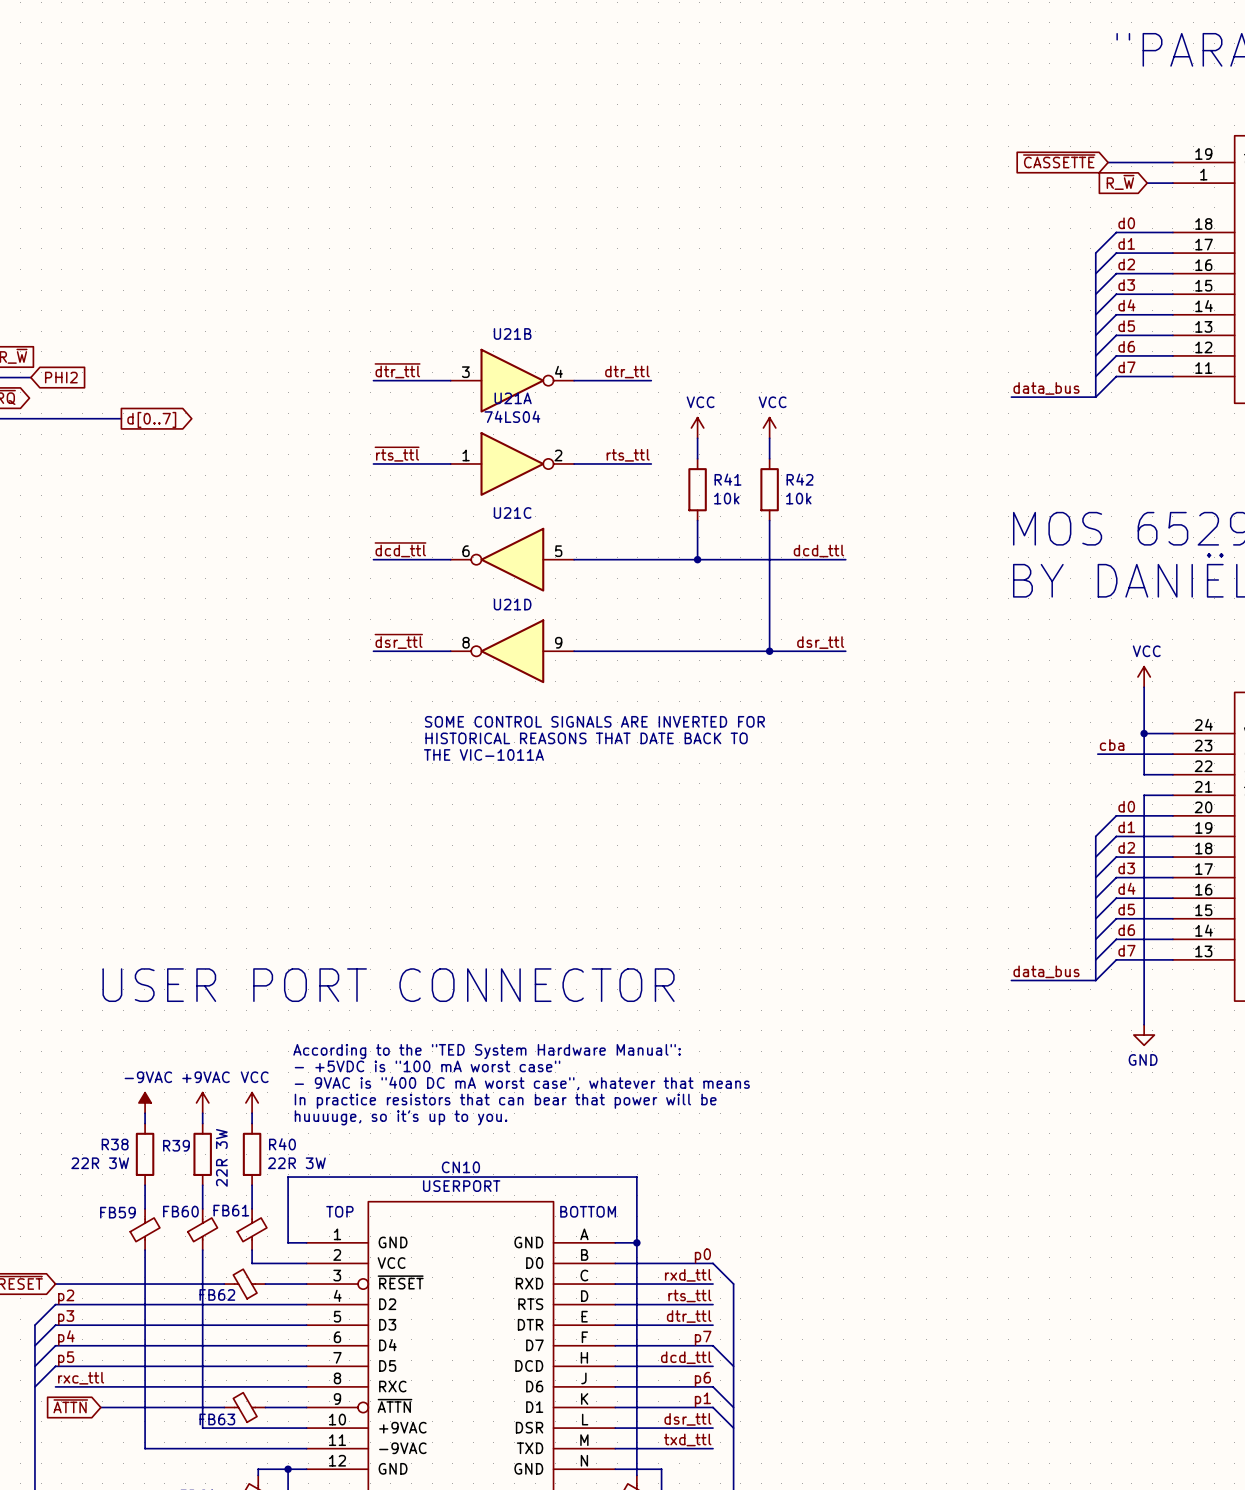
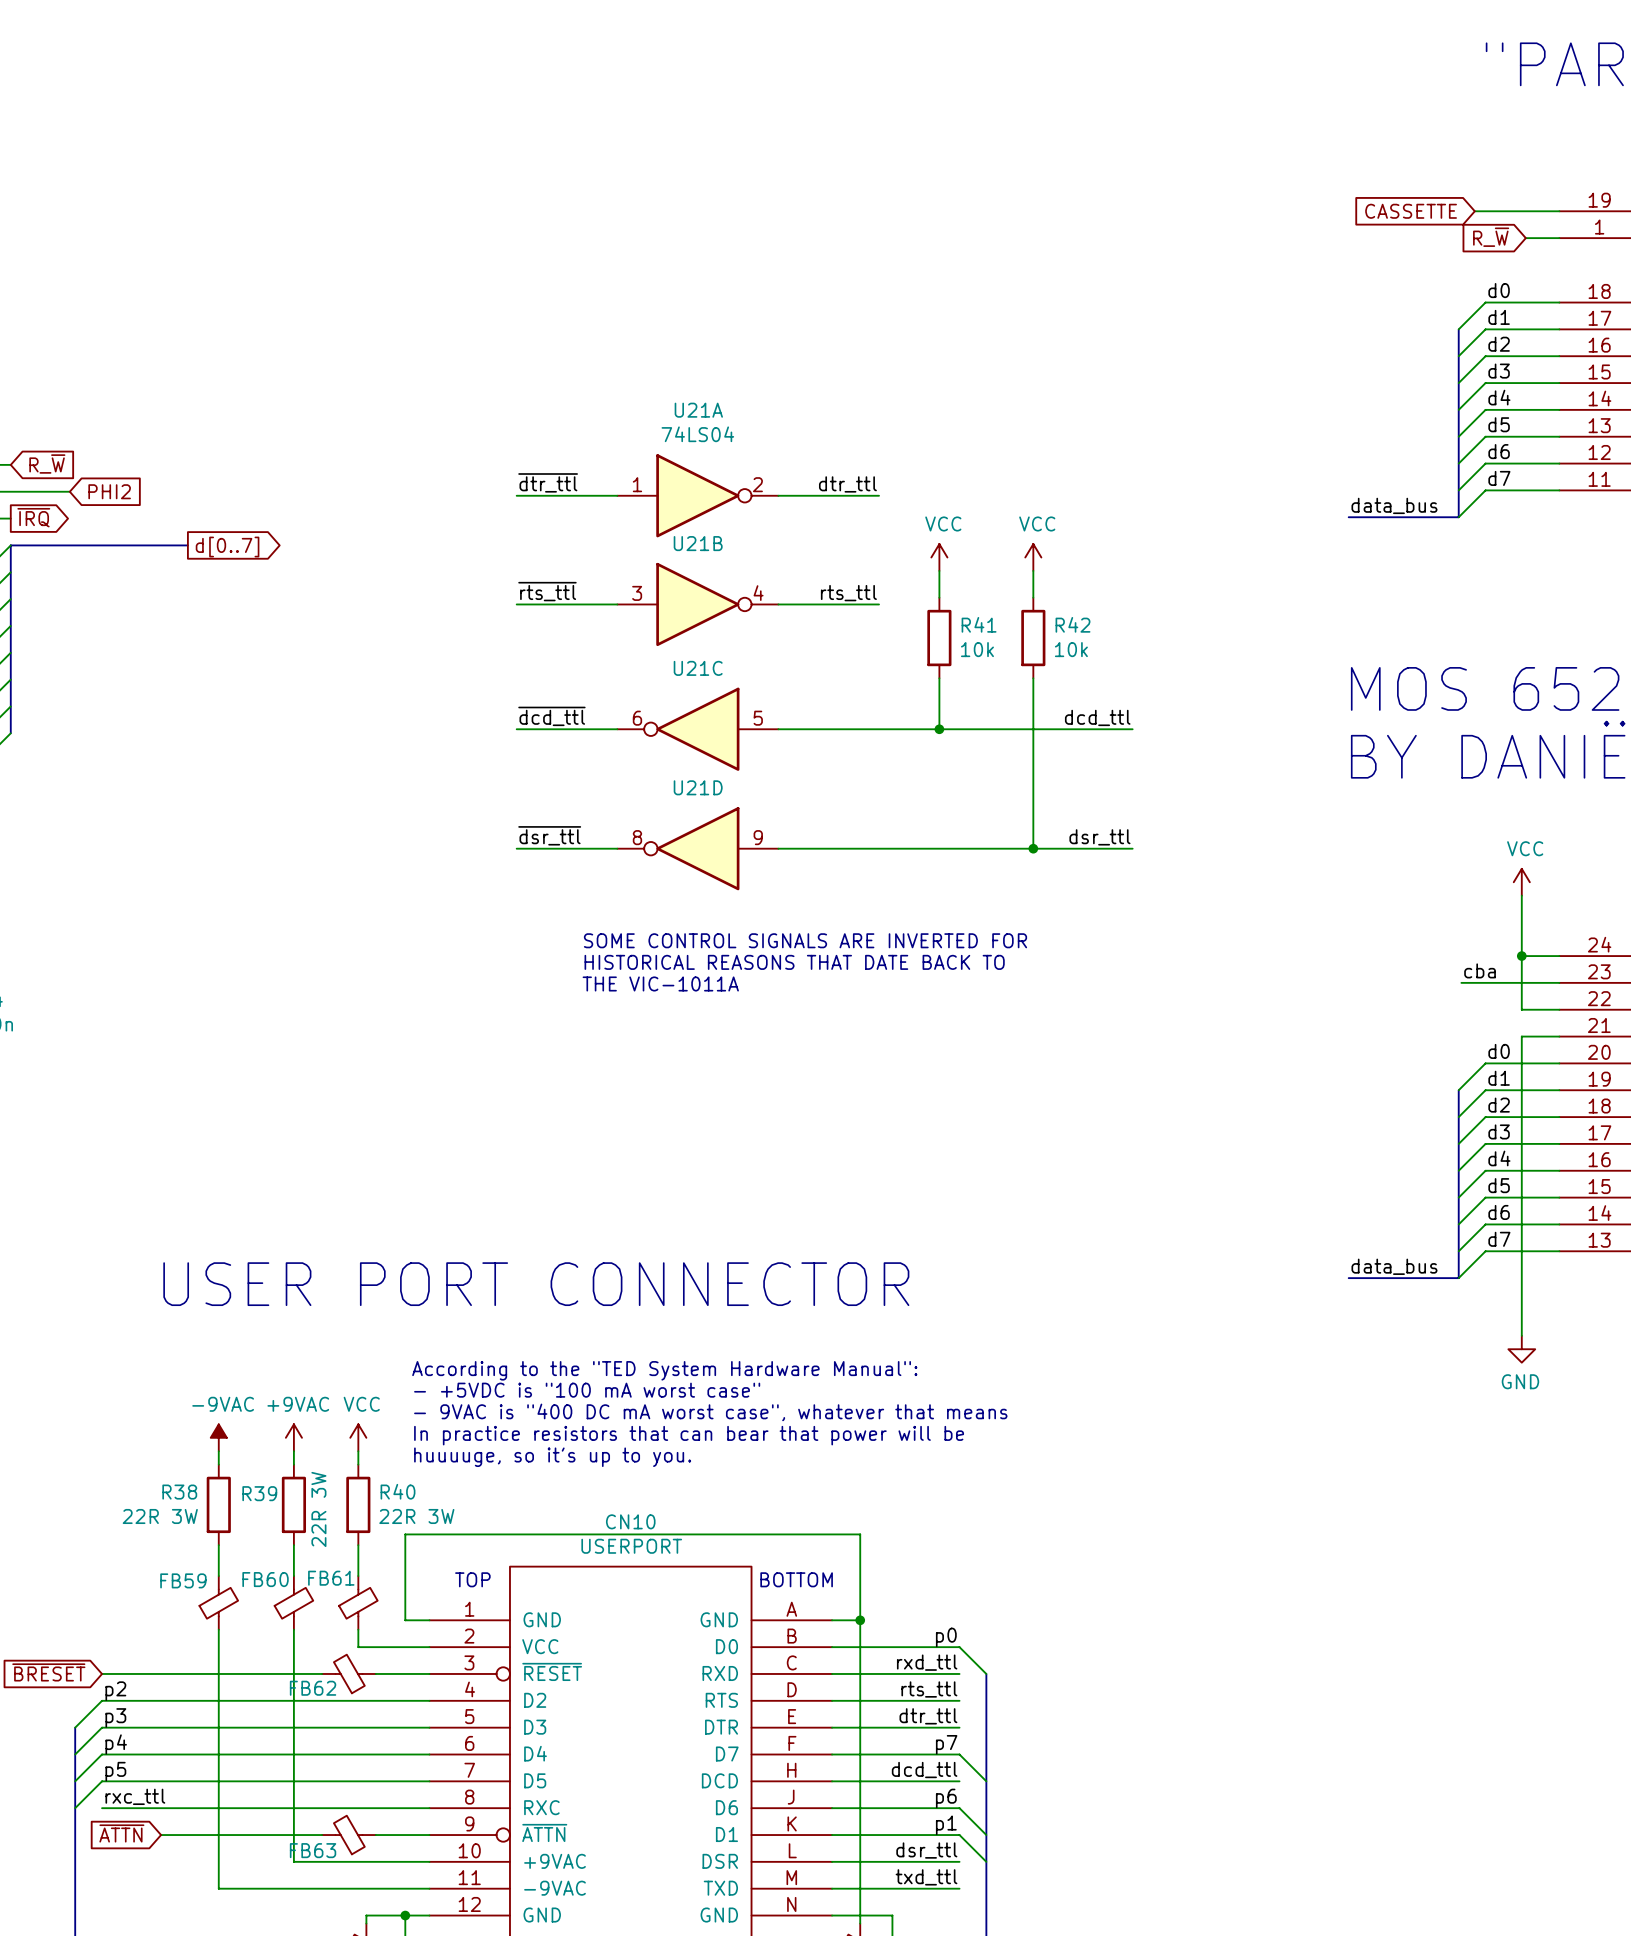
global label: ~{CASSETTE} (1059, 161) -> CASSETTE (1411, 211)
U21B position: (512, 380) -> (697, 604)
U21A position: (512, 463) -> (697, 495)

